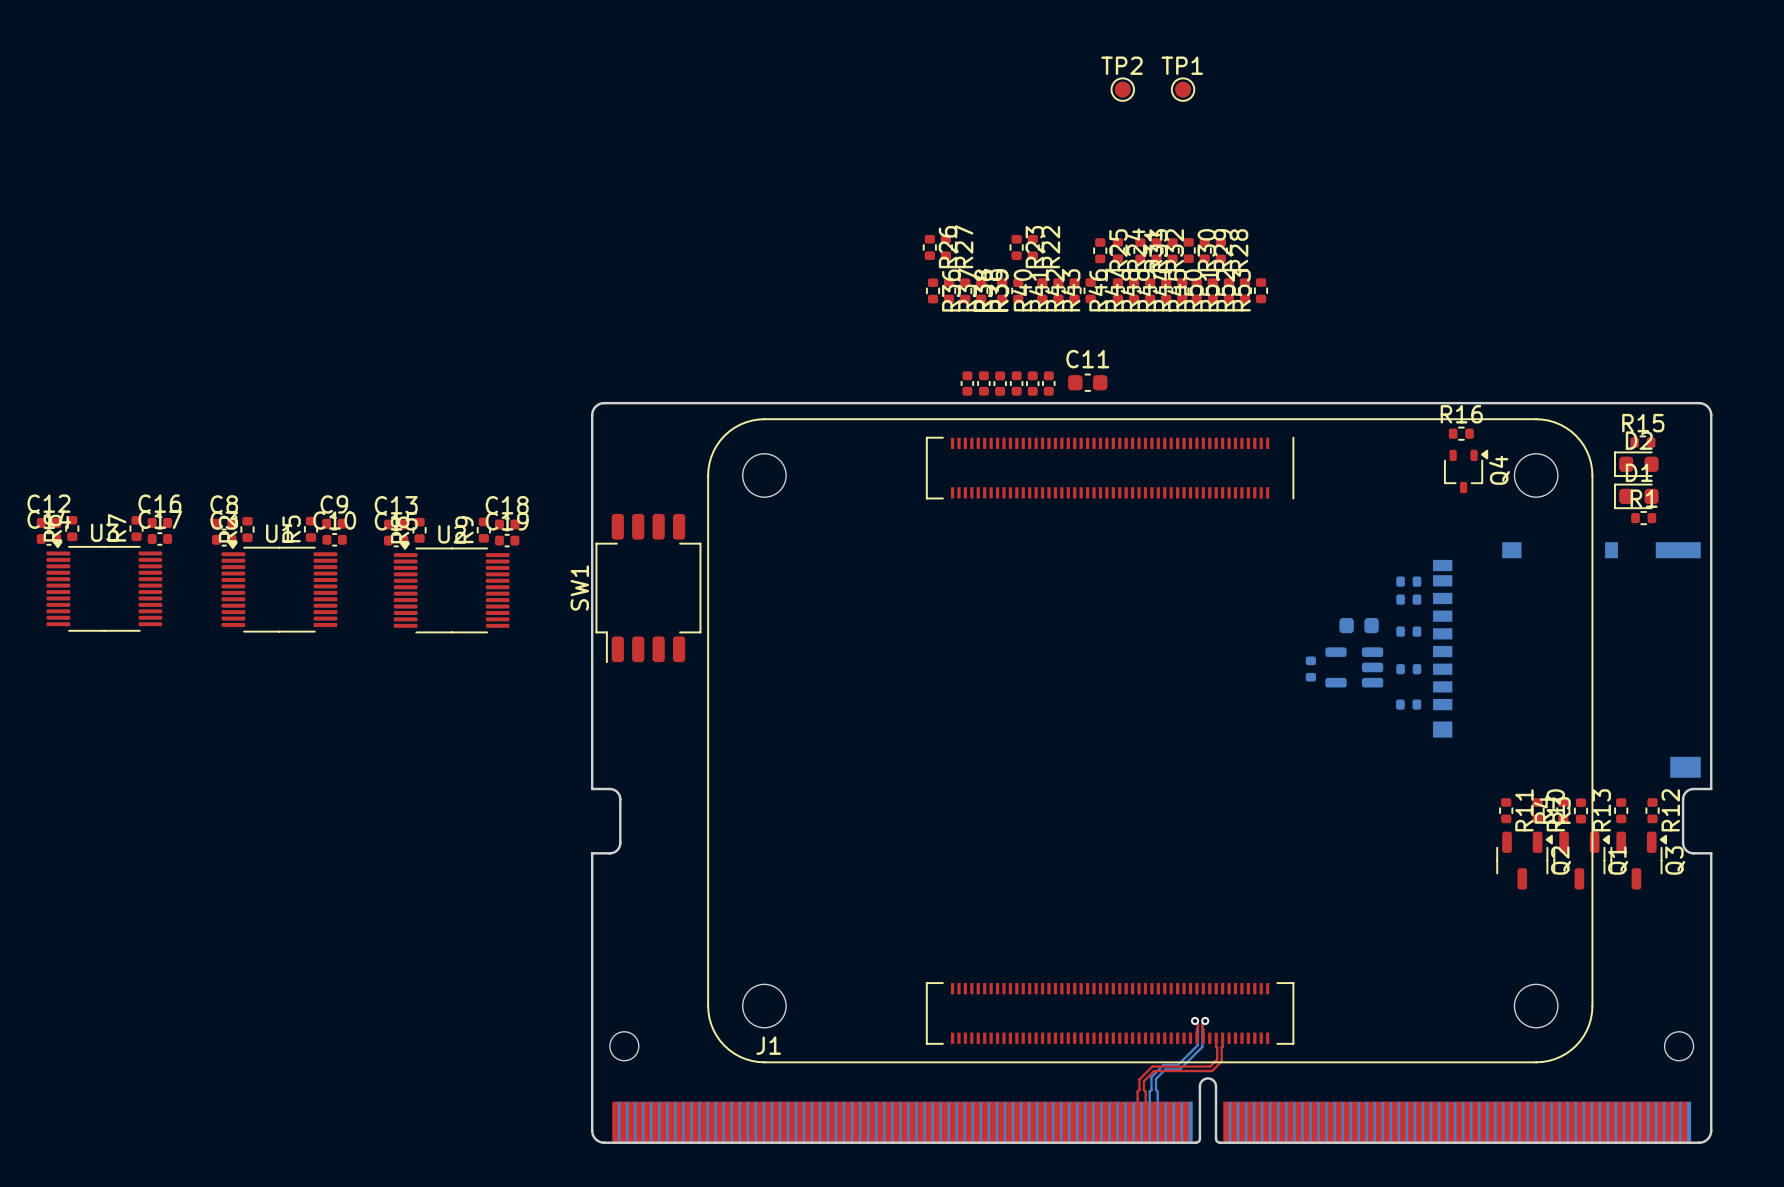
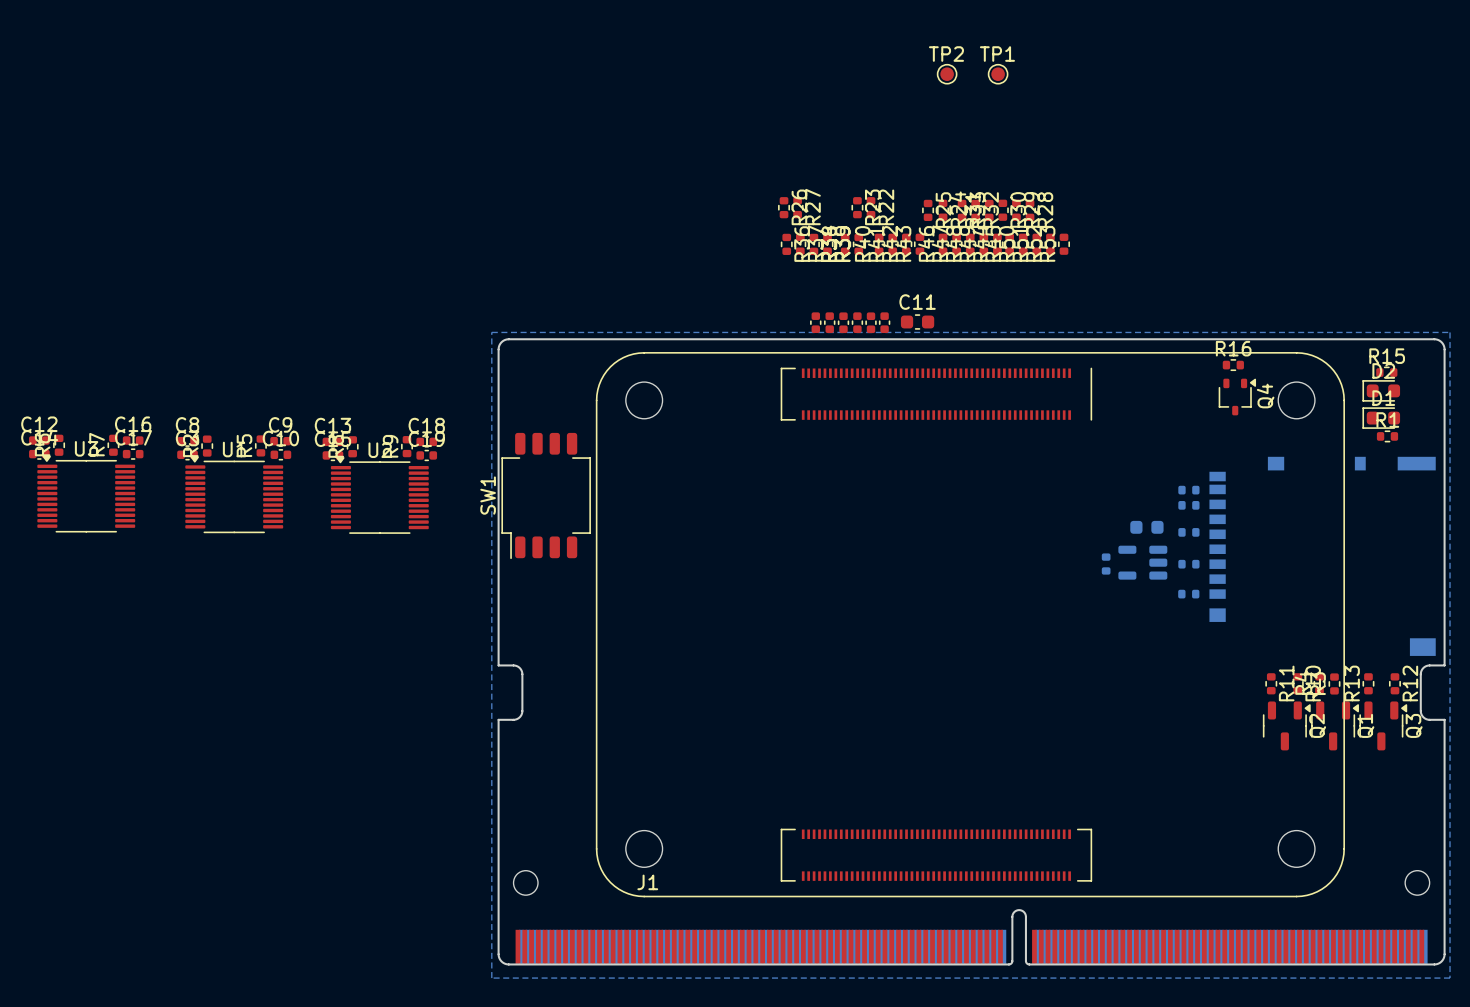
bottom zone outline: none -> (491, 332) (1450, 332) (1450, 978) (491, 978) (491, 332)
top track: (1195, 1020) (1197, 1023) (1196, 1038) -> none
bottom track: (1195, 1020) (1197, 1023) (1197, 1045) (1178, 1064) (1163, 1064) (1151, 1077) (1149, 1121) -> none
via: (1195, 1020) -> none
top track: (1205, 1020) (1202, 1023) (1203, 1038) -> none
bottom track: (1205, 1020) (1202, 1023) (1202, 1046) (1179, 1069) (1165, 1069) (1155, 1078) (1157, 1121) -> none
via: (1205, 1020) -> none
top track: (1216, 1038) (1217, 1059) (1210, 1066) (1152, 1066) (1139, 1079) (1137, 1121) -> none
top track: (1222, 1038) (1221, 1061) (1212, 1070) (1154, 1070) (1143, 1081) (1145, 1121) -> none

